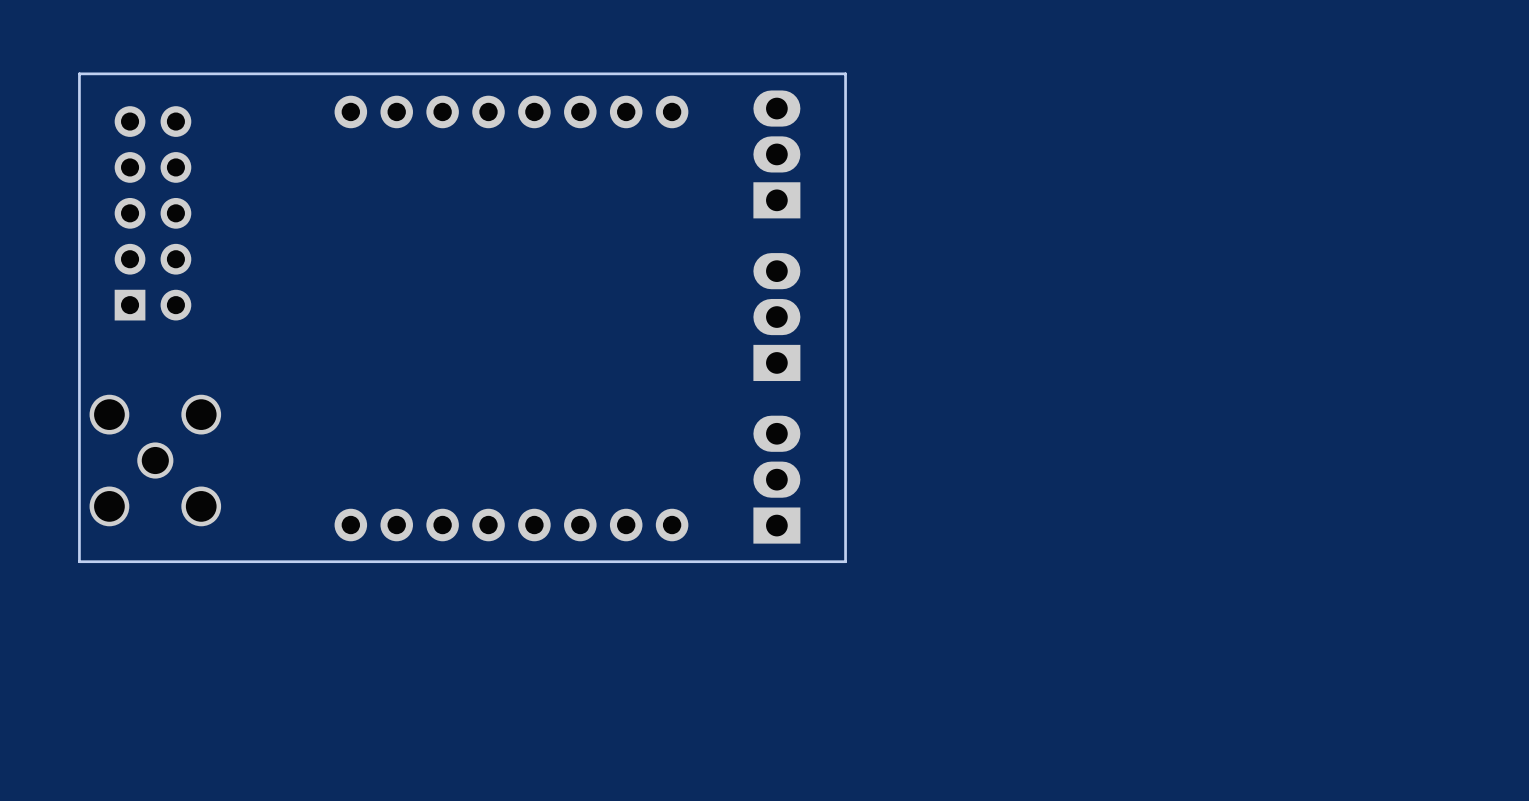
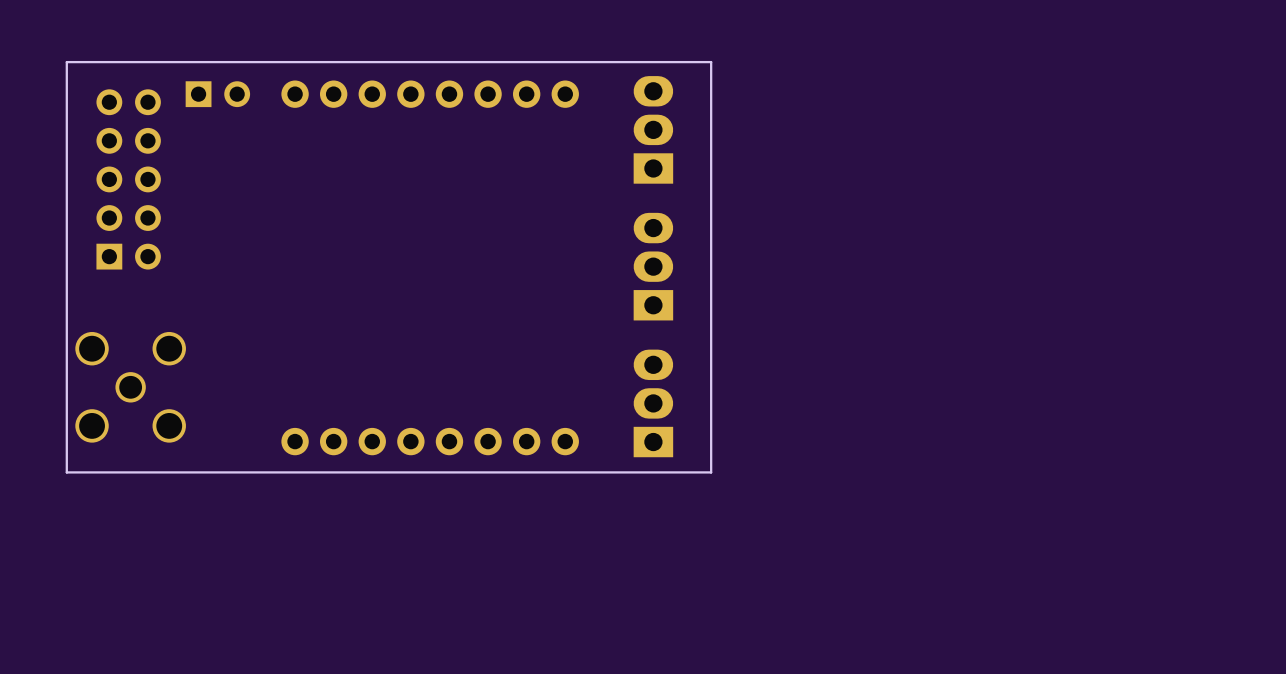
part: none -> (217, 94)

